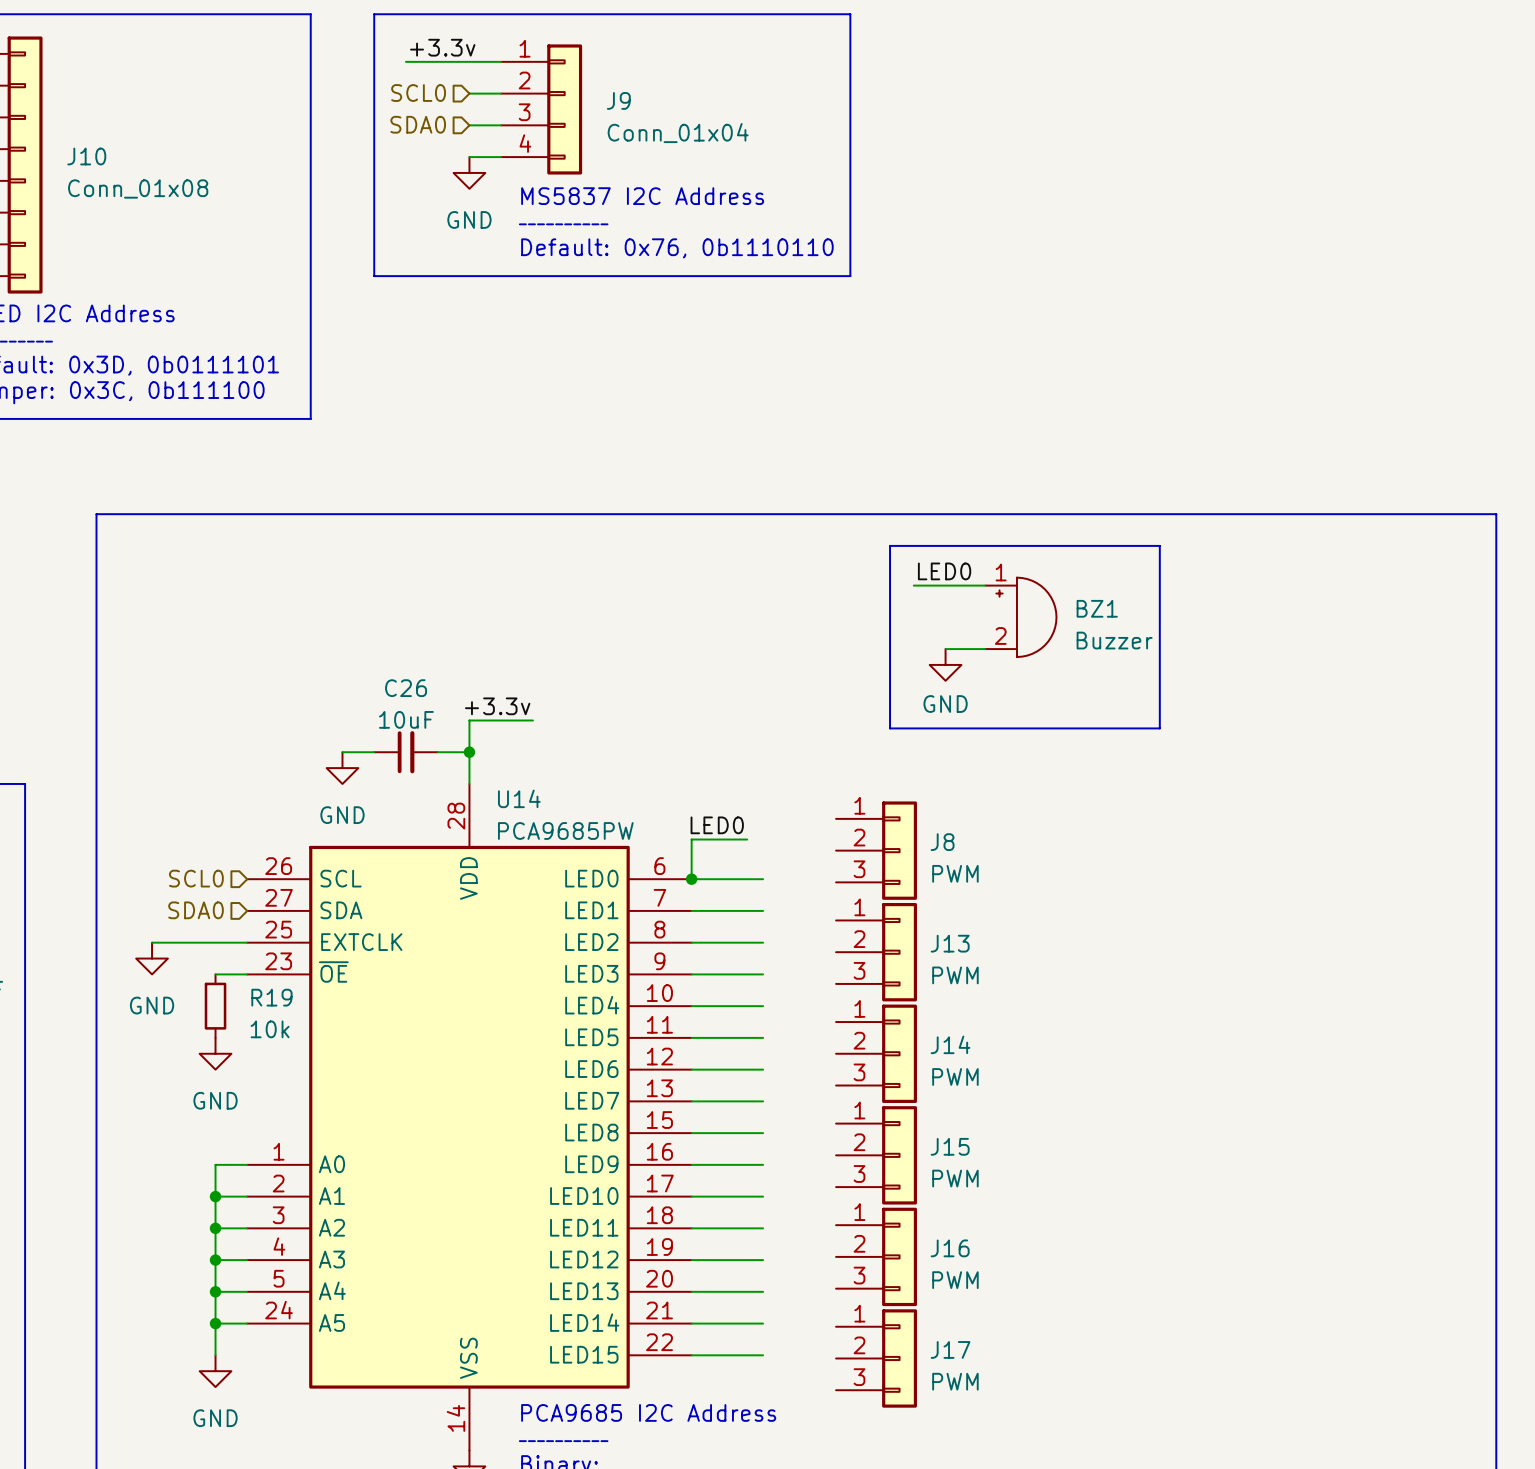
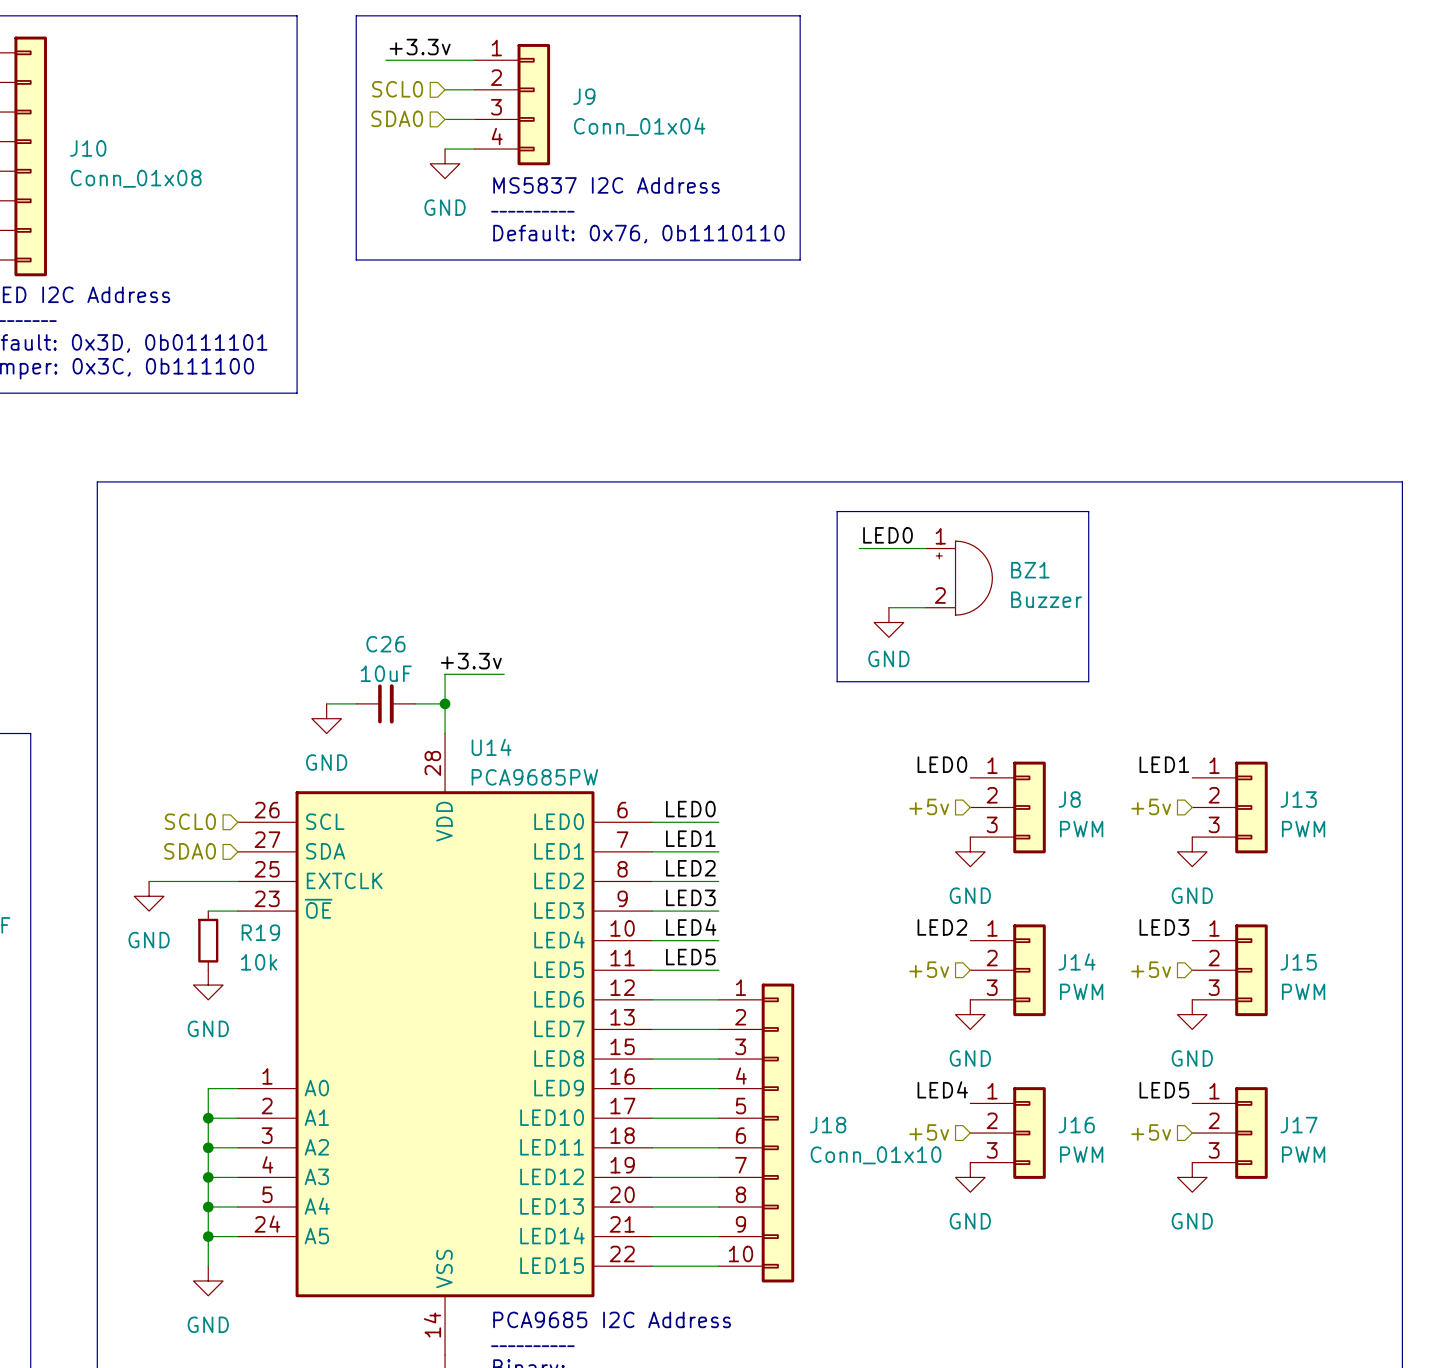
label: none -> LED0 (942, 764)
label: none -> LED1 (1164, 764)
label position: LED0 (717, 825) -> LED0 (690, 809)
wire: (747, 839) (691, 839) (691, 879) -> none
J8 position: (876, 850) -> (1008, 807)
hierarchical label: none -> +5v (929, 806)
hierarchical label: none -> +5v (1151, 806)
junction: (691, 879) -> none
label: none -> LED1 (690, 838)
power symbol: none -> GND (970, 851)
power symbol: none -> GND (1192, 851)
label: none -> LED2 (690, 868)
J13 position: (876, 952) -> (1230, 807)
label: none -> LED3 (690, 897)
label: none -> LED4 (691, 927)
label: none -> LED2 (942, 927)
label: none -> LED3 (1164, 927)
label: none -> LED5 (690, 957)
hierarchical label: none -> +5v (929, 969)
hierarchical label: none -> +5v (1151, 969)
J14 position: (876, 1053) -> (1008, 970)
power symbol: none -> GND (970, 1014)
power symbol: none -> GND (1192, 1014)
J15 position: (876, 1155) -> (1230, 970)
label: none -> LED4 (942, 1089)
label: none -> LED5 (1164, 1090)
hierarchical label: none -> +5v (929, 1132)
hierarchical label: none -> +5v (1151, 1132)
J18: none -> Conn_01x10 (756, 1133)
J16 position: (876, 1256) -> (1008, 1133)
power symbol: none -> GND (970, 1177)
power symbol: none -> GND (1192, 1177)
J17 position: (876, 1358) -> (1230, 1133)

